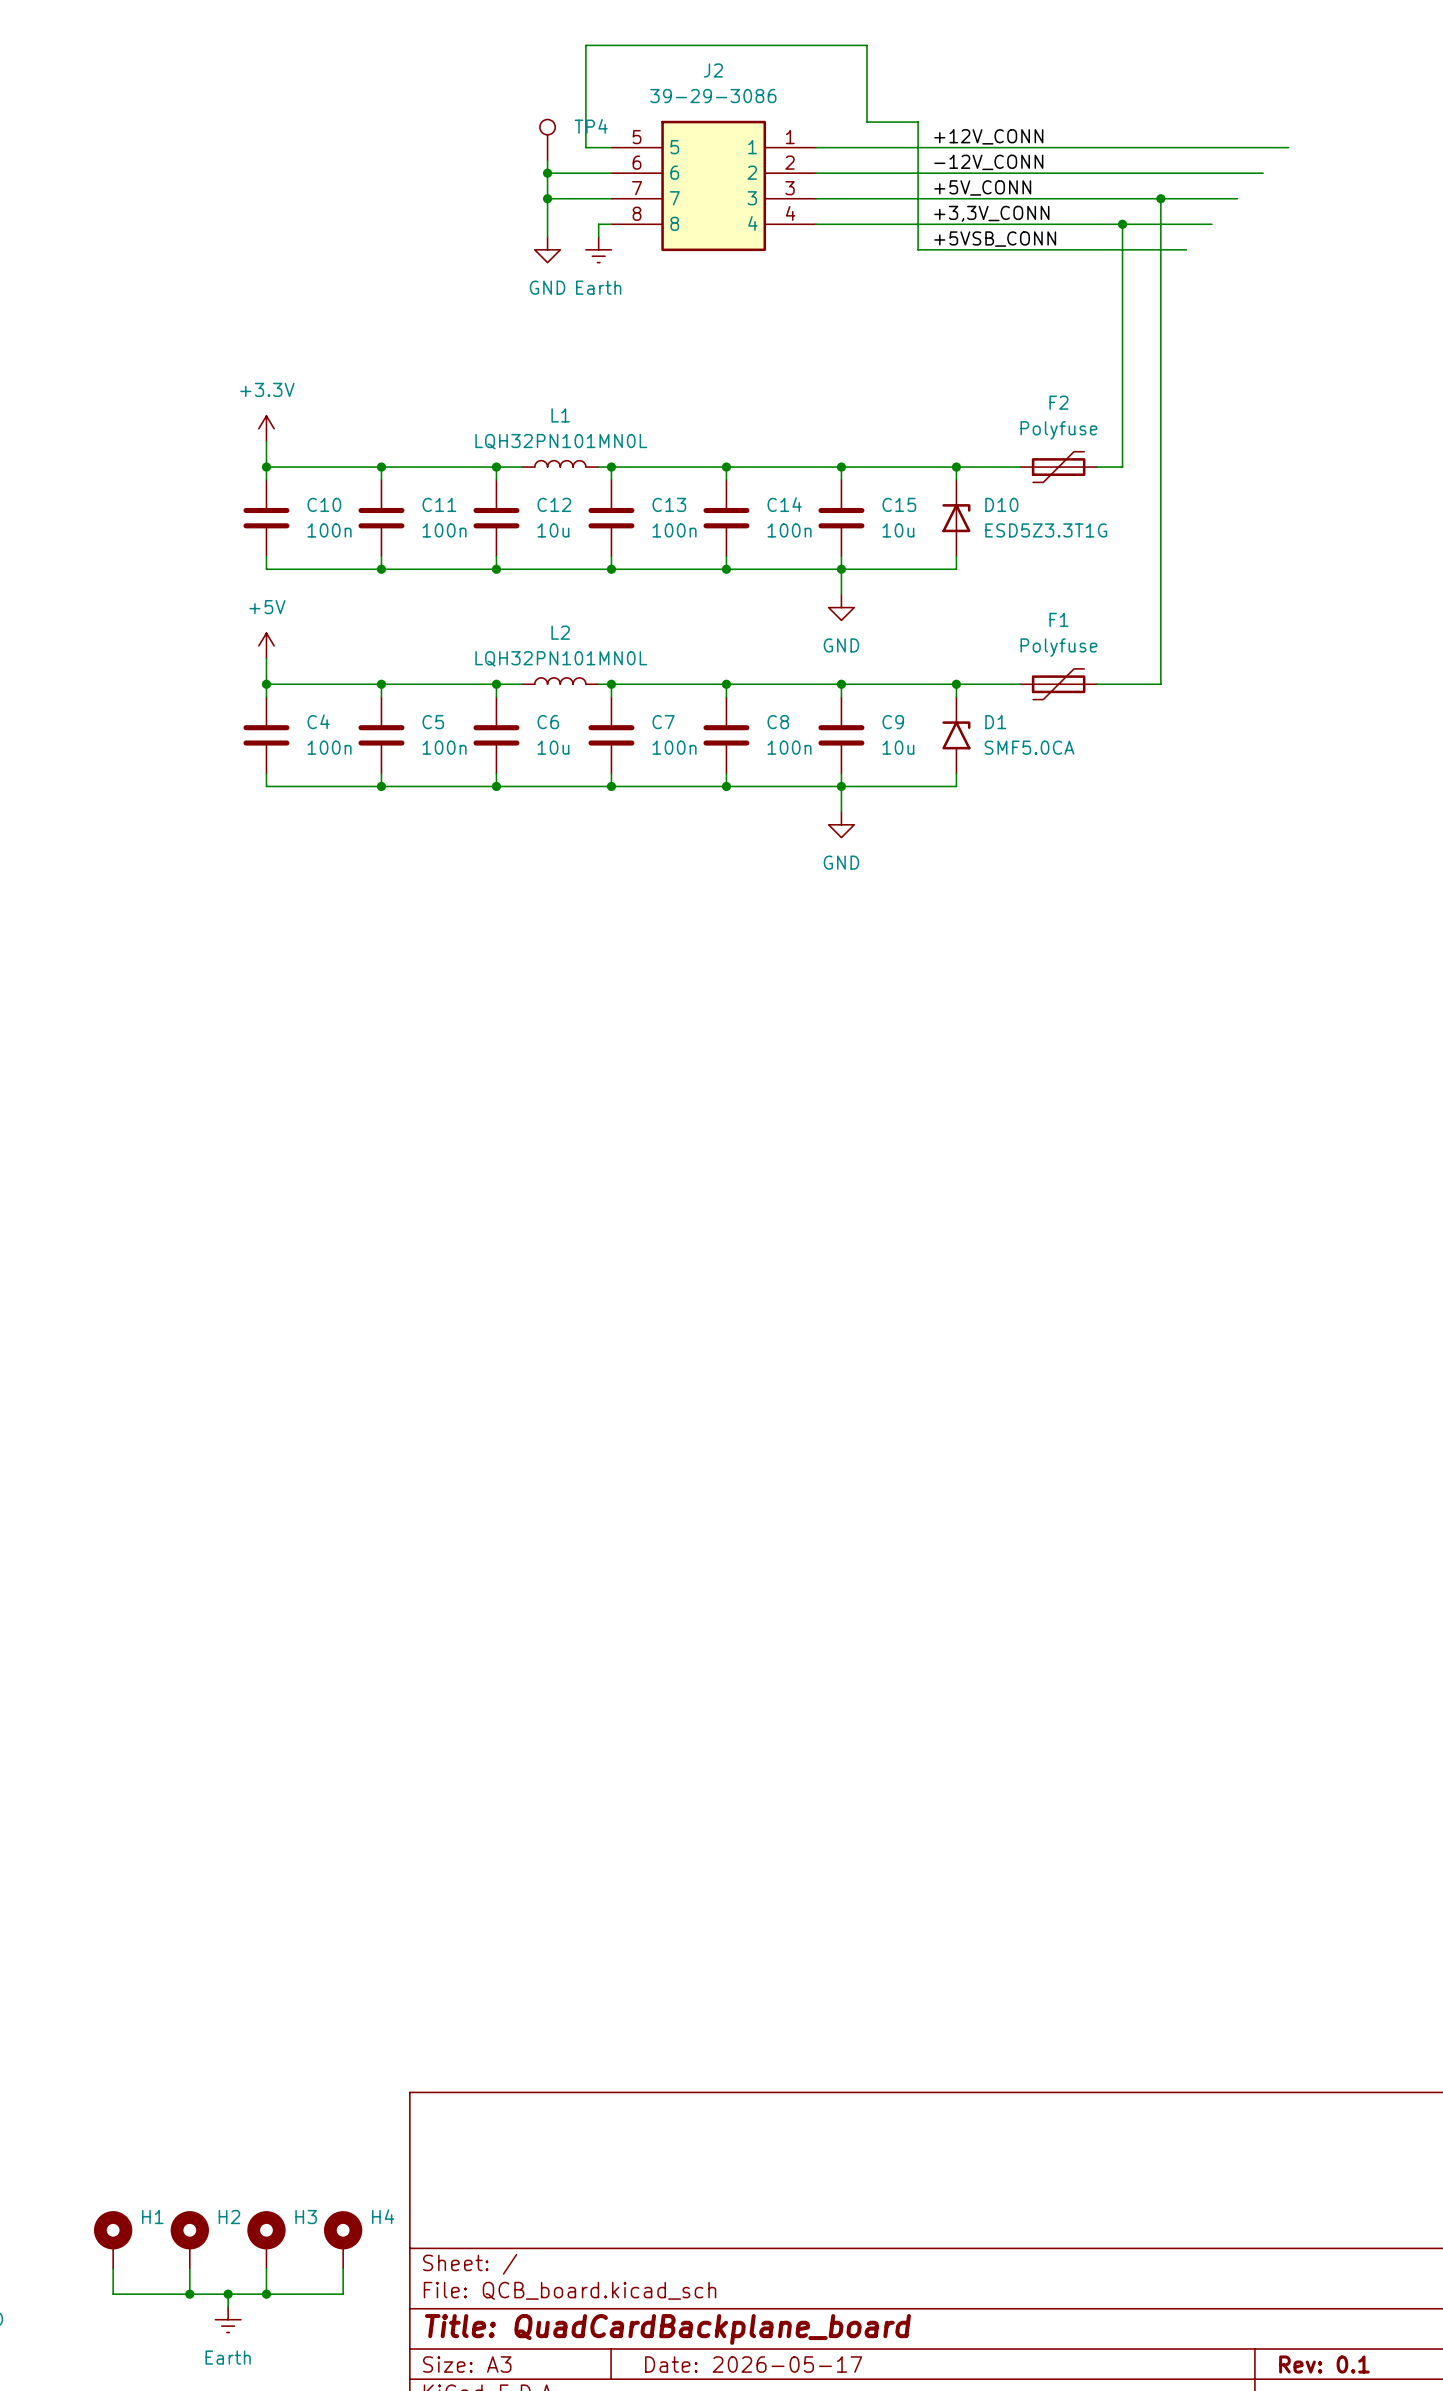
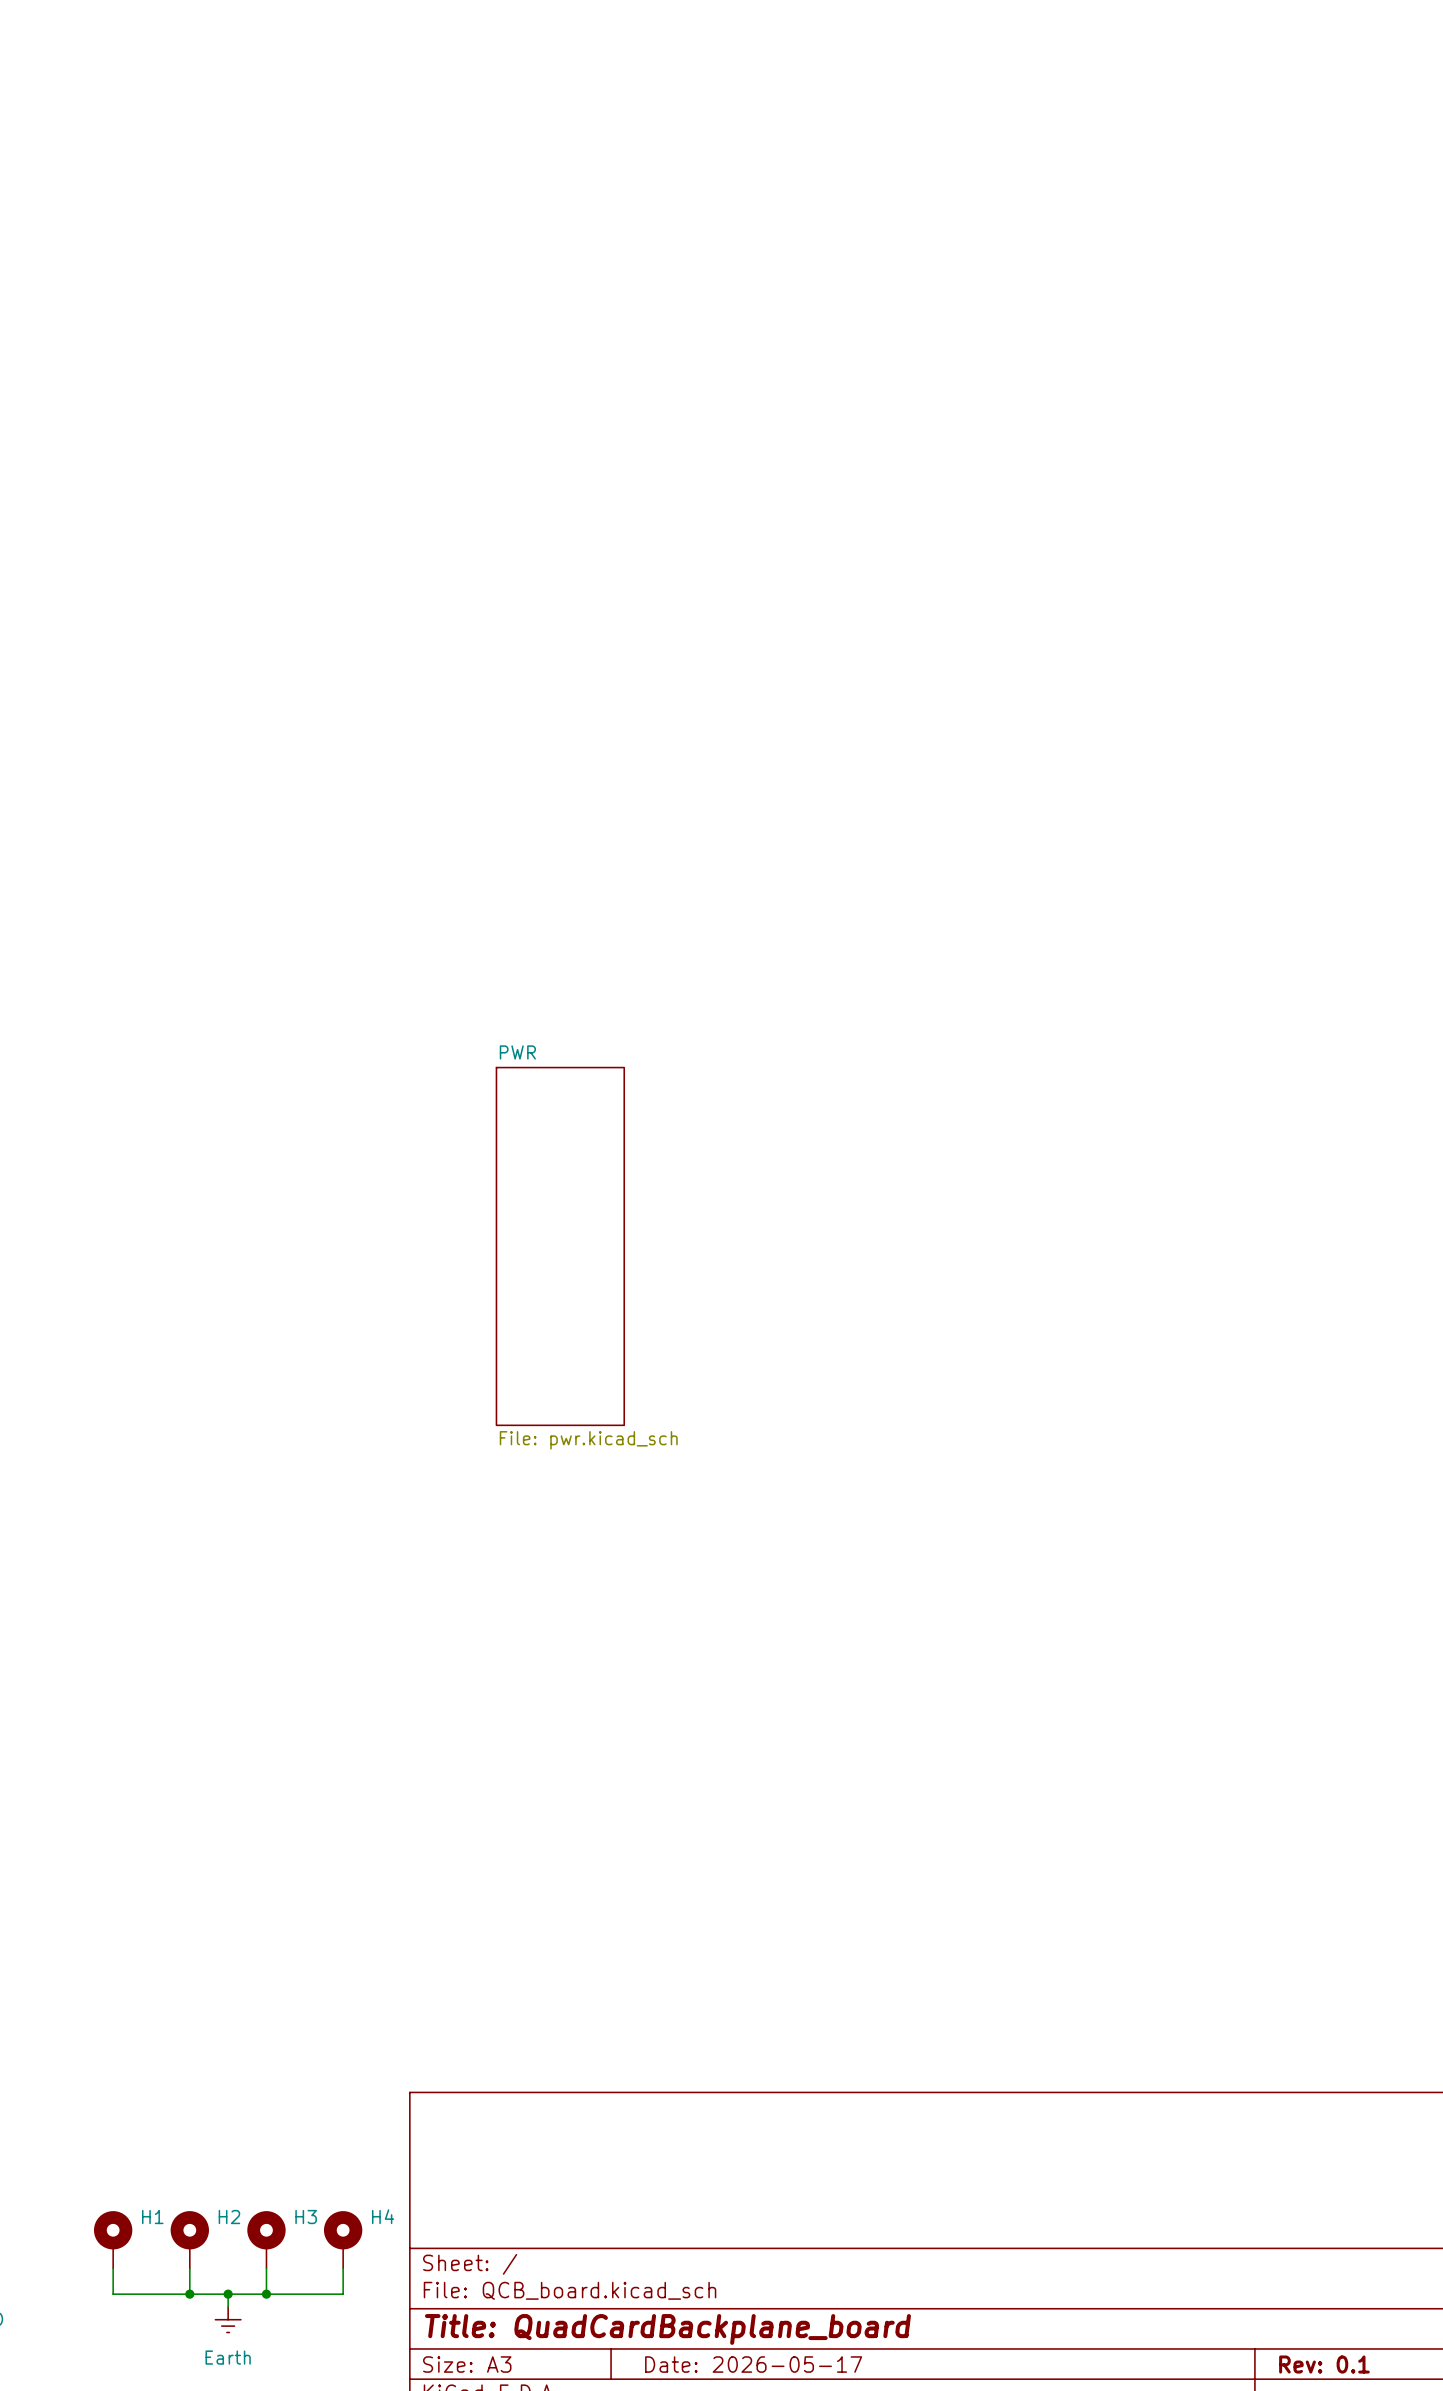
label: +12V_CONN (988, 136) -> none
TP4: (547, 139) -> none
wire: (611, 147) (585, 147) (585, 45) (866, 45) (866, 122) (918, 122) (918, 249) (1186, 249) -> none
wire: (815, 147) (1288, 147) -> none
wire: (547, 160) (547, 237) -> none
label: -12V_CONN (988, 162) -> none
wire: (547, 173) (611, 173) -> none
junction: (547, 173) -> none
wire: (815, 173) (1263, 173) -> none
J2: 39-29-3086 (713, 185) -> none
label: +5V_CONN (982, 187) -> none
wire: (547, 198) (611, 198) -> none
junction: (547, 198) -> none
wire: (815, 198) (1237, 198) -> none
wire: (1160, 198) (1160, 684) (1096, 684) -> none
junction: (1160, 198) -> none
label: +3,3V_CONN (991, 213) -> none
wire: (611, 224) (598, 224) (598, 237) -> none
wire: (815, 224) (1211, 224) -> none
wire: (1122, 224) (1122, 467) (1096, 467) -> none
junction: (1122, 224) -> none
label: +5VSB_CONN (995, 239) -> none
power symbol: GND (547, 249) -> none
power symbol: Earth (598, 249) -> none
power symbol: +3.3V (266, 428) -> none
wire: (266, 441) (266, 479) -> none
L1: LQH32PN101MN0L (560, 463) -> none
wire: (266, 467) (522, 467) -> none
junction: (266, 467) -> none
wire: (381, 467) (381, 479) -> none
junction: (381, 467) -> none
wire: (496, 467) (496, 479) -> none
junction: (496, 467) -> none
wire: (598, 467) (1020, 467) -> none
wire: (611, 467) (611, 479) -> none
junction: (611, 467) -> none
wire: (726, 467) (726, 479) -> none
junction: (726, 467) -> none
wire: (841, 467) (841, 479) -> none
junction: (841, 467) -> none
wire: (956, 467) (956, 479) -> none
junction: (956, 467) -> none
F2: Polyfuse (1058, 467) -> none
C10: 100n (266, 518) -> none
C11: 100n (381, 518) -> none
C12: 10u (496, 518) -> none
C13: 100n (611, 518) -> none
C14: 100n (726, 518) -> none
C15: 10u (841, 518) -> none
D10: ESD5Z3.3T1G (956, 518) -> none
wire: (266, 556) (266, 569) (956, 569) (956, 556) -> none
wire: (381, 556) (381, 569) -> none
wire: (496, 556) (496, 569) -> none
wire: (611, 556) (611, 569) -> none
wire: (726, 556) (726, 569) -> none
wire: (841, 556) (841, 594) -> none
junction: (381, 569) -> none
junction: (496, 569) -> none
junction: (611, 569) -> none
junction: (726, 569) -> none
junction: (841, 569) -> none
power symbol: GND (841, 607) -> none
power symbol: +5V (266, 645) -> none
wire: (266, 658) (266, 697) -> none
L2: LQH32PN101MN0L (560, 681) -> none
wire: (266, 684) (522, 684) -> none
junction: (266, 684) -> none
wire: (381, 684) (381, 697) -> none
junction: (381, 684) -> none
wire: (496, 684) (496, 697) -> none
junction: (496, 684) -> none
wire: (598, 684) (1020, 684) -> none
wire: (611, 684) (611, 697) -> none
junction: (611, 684) -> none
wire: (726, 684) (726, 697) -> none
junction: (726, 684) -> none
wire: (841, 684) (841, 697) -> none
junction: (841, 684) -> none
wire: (956, 684) (956, 697) -> none
junction: (956, 684) -> none
F1: Polyfuse (1058, 684) -> none
C4: 100n (266, 735) -> none
C5: 100n (381, 735) -> none
C6: 10u (496, 735) -> none
C7: 100n (611, 735) -> none
C8: 100n (726, 735) -> none
C9: 10u (841, 735) -> none
D1: SMF5.0CA (956, 735) -> none
wire: (266, 773) (266, 786) (956, 786) (956, 773) -> none
wire: (381, 773) (381, 786) -> none
wire: (496, 773) (496, 786) -> none
wire: (611, 773) (611, 786) -> none
wire: (726, 773) (726, 786) -> none
wire: (841, 773) (841, 812) -> none
junction: (381, 786) -> none
junction: (496, 786) -> none
junction: (611, 786) -> none
junction: (726, 786) -> none
junction: (841, 786) -> none
power symbol: GND (841, 824) -> none
sheet PWR: none -> File: pwr.kicad_sch (560, 1246)

